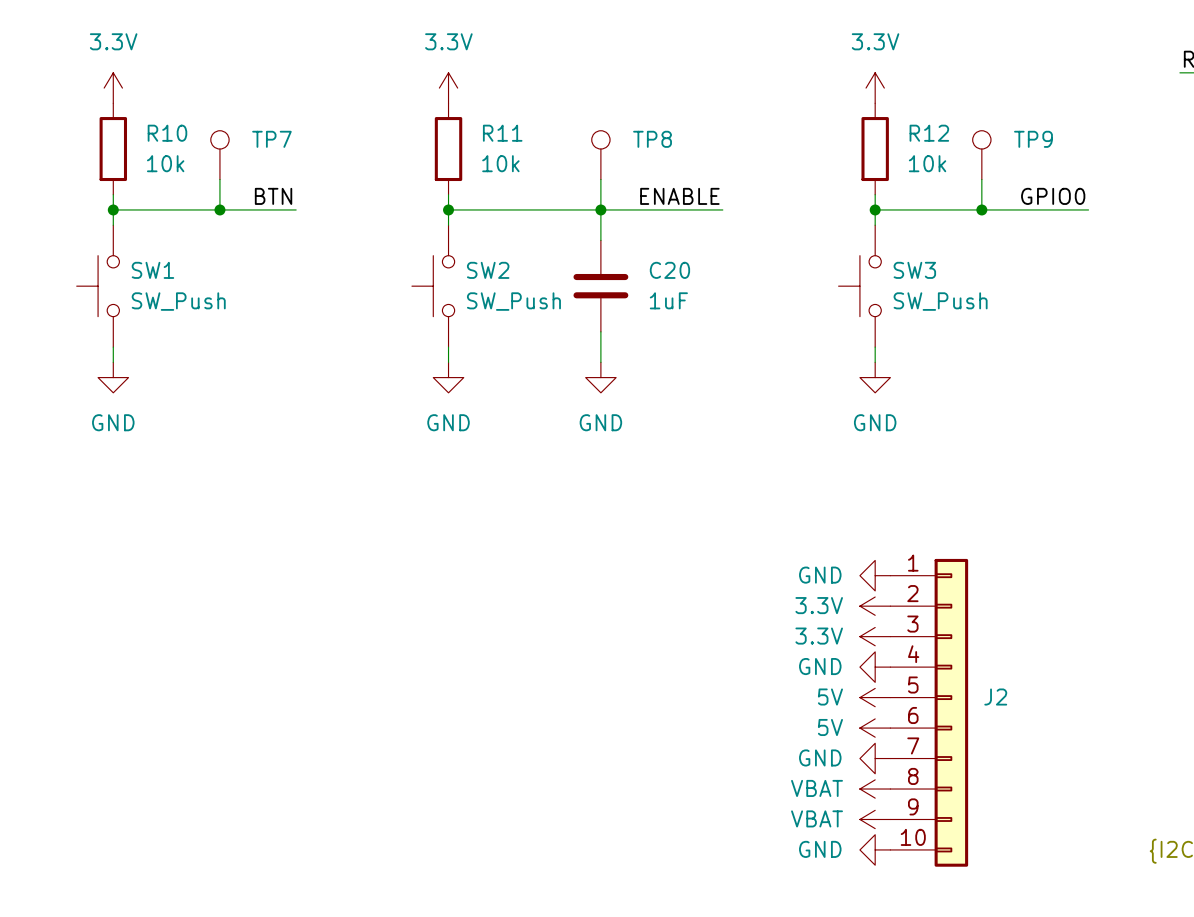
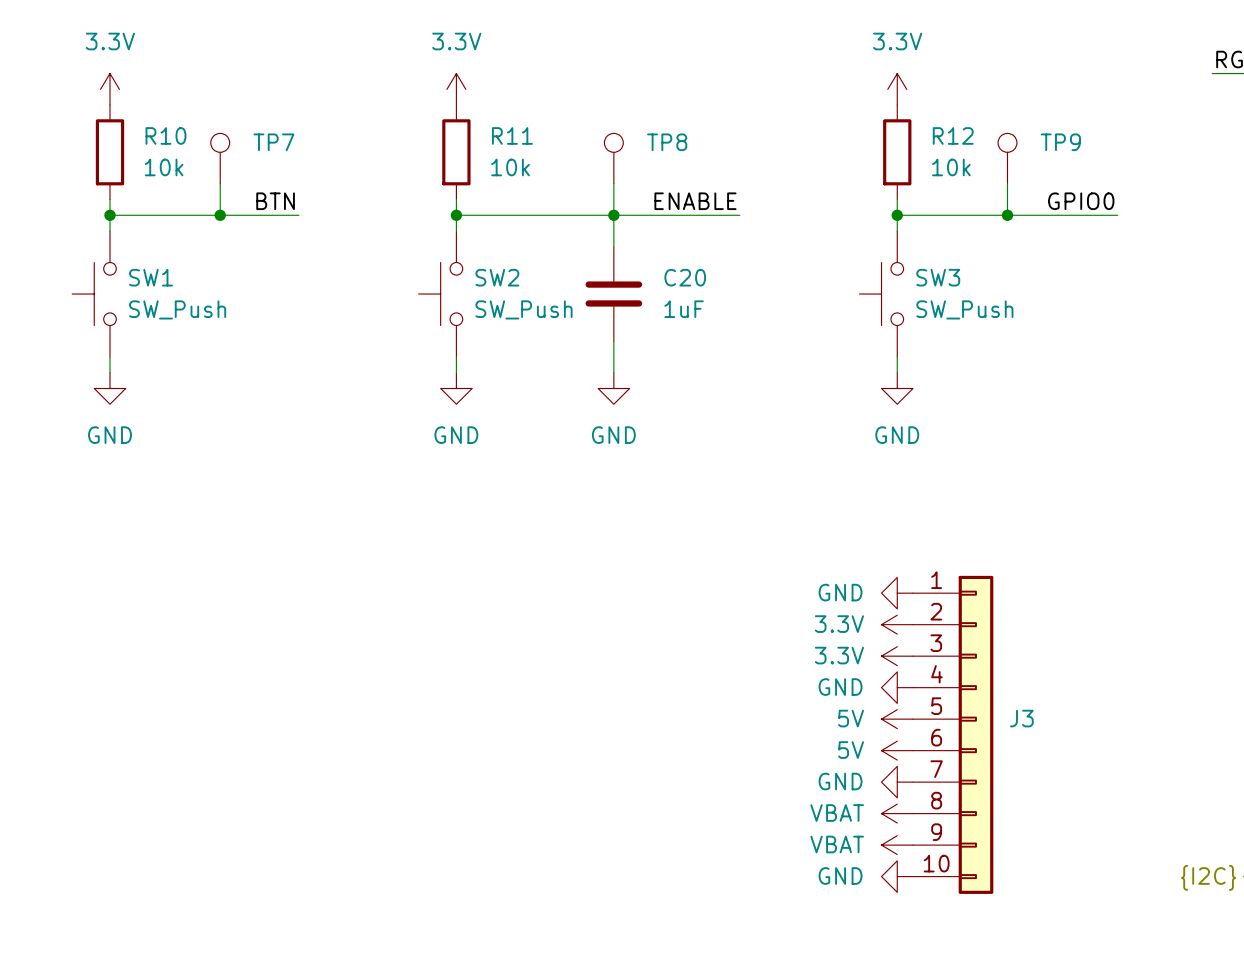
J2 name: J2 (995, 697) -> J3 (1021, 718)

